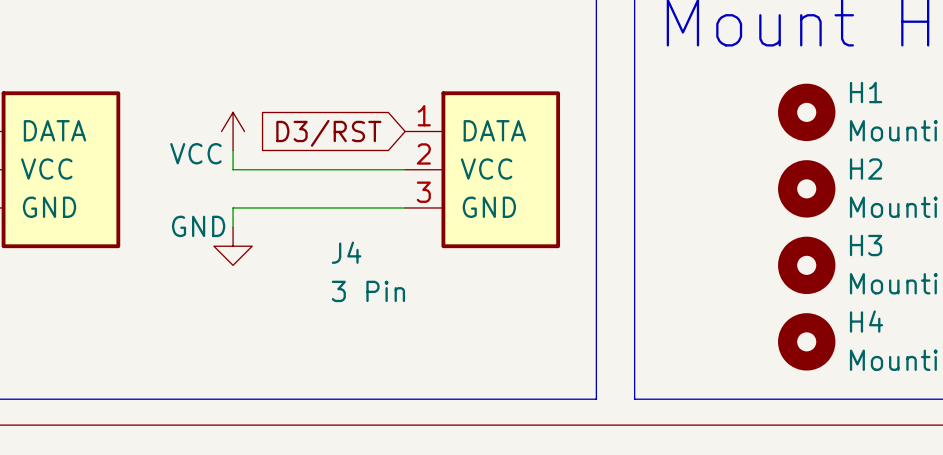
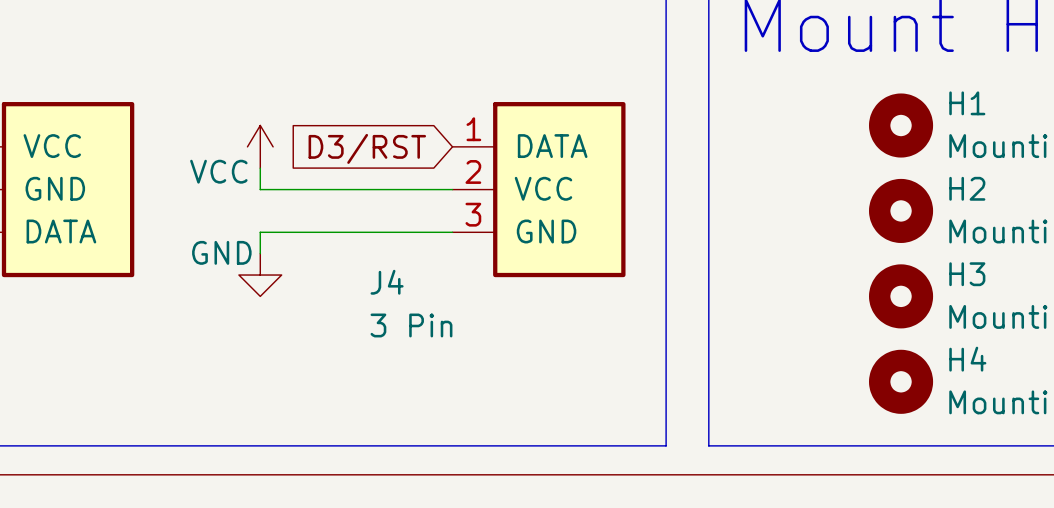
part pin name: DATA (54, 130) -> VCC (52, 146)
part pin name: VCC (46, 169) -> GND (55, 188)
part pin name: GND (49, 207) -> DATA (61, 231)

